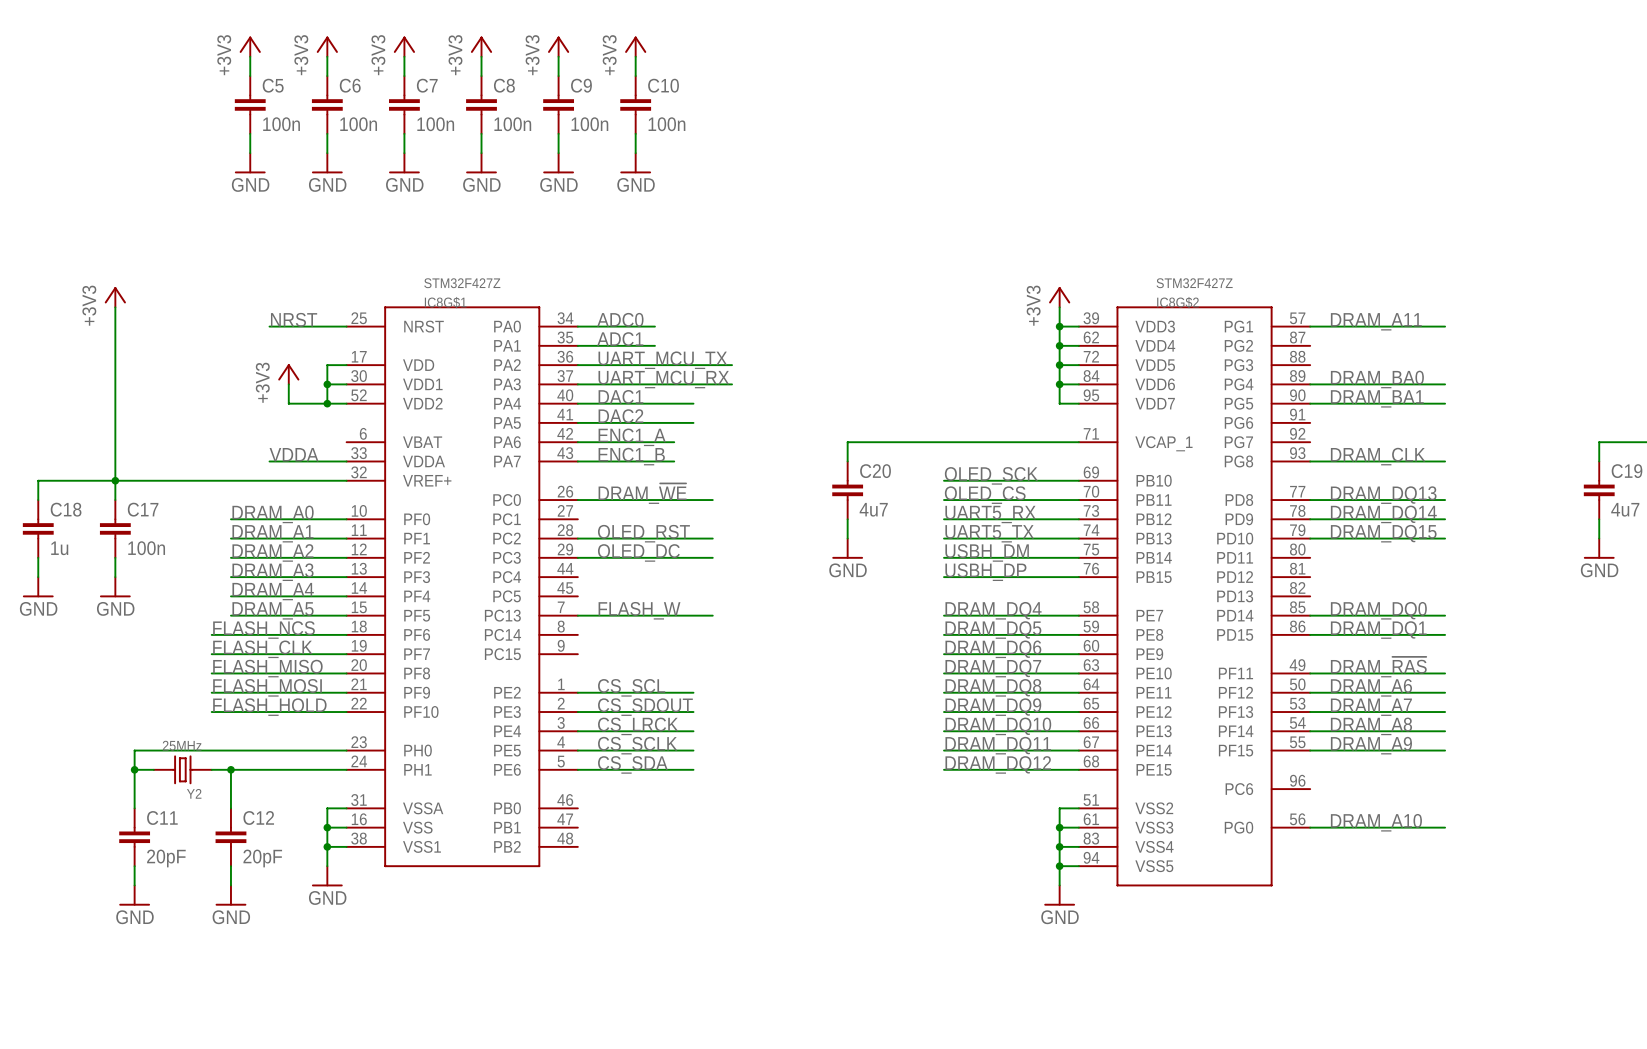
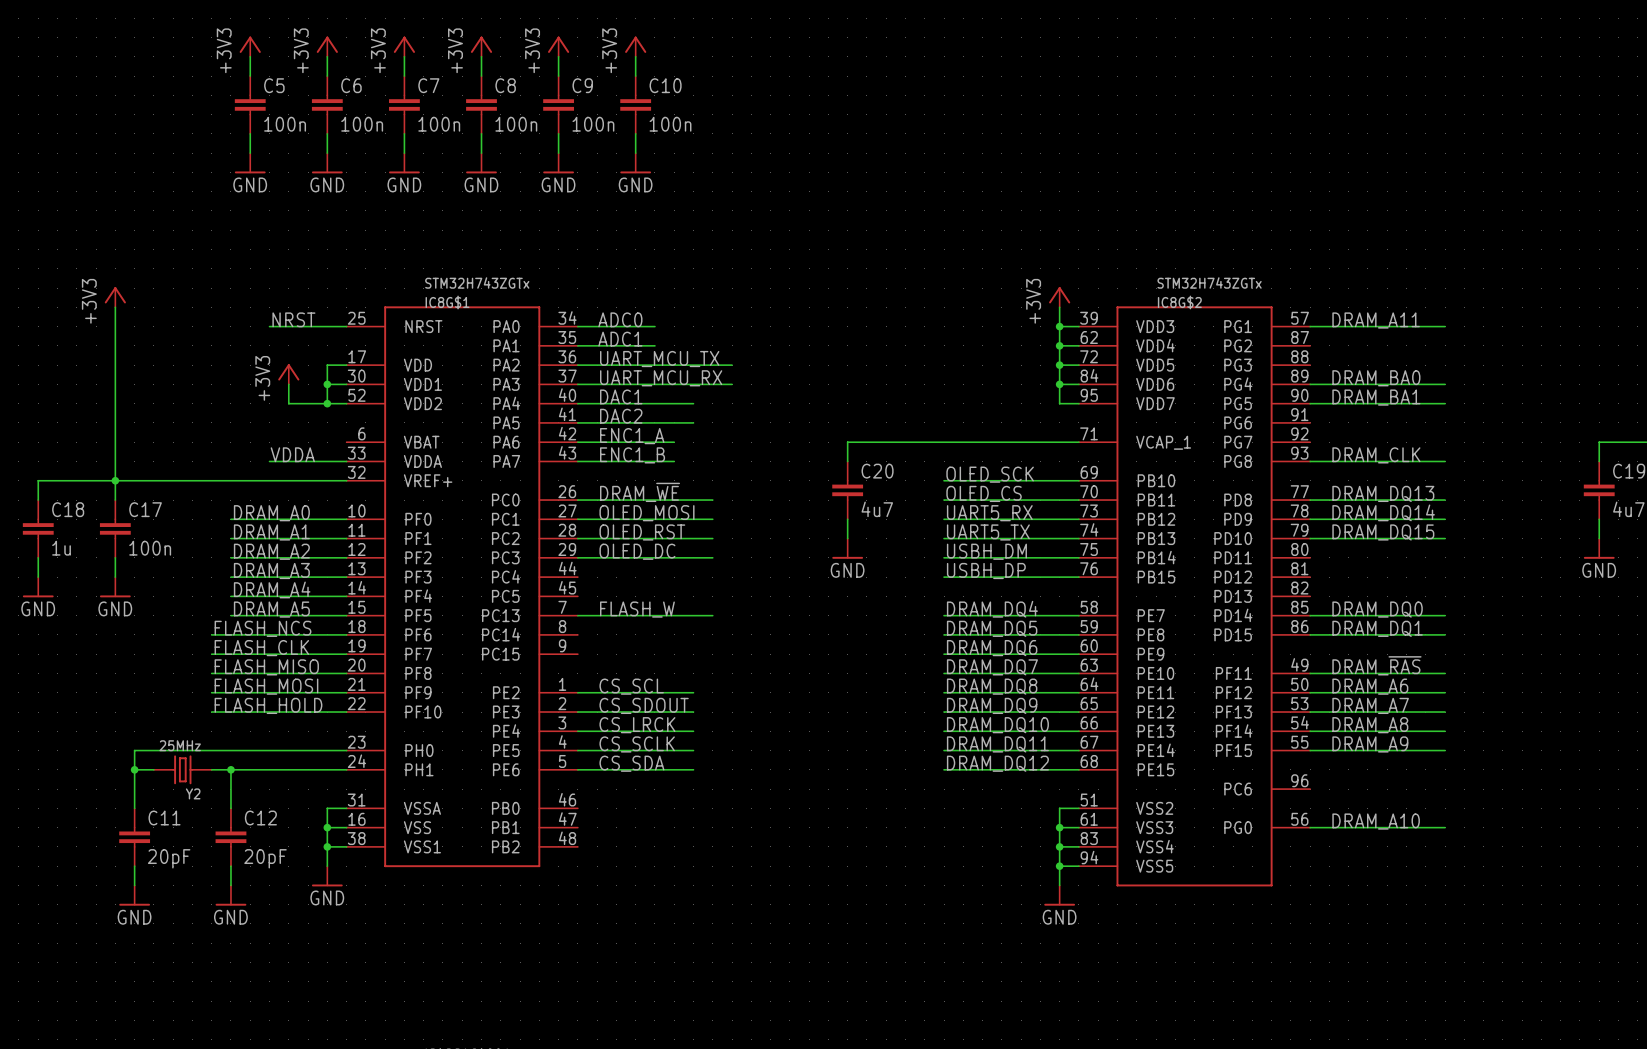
IC8G$1 value: STM32F427Z (462, 283) -> STM32H743ZGTx (477, 282)
IC8G$2 value: STM32F427Z (1194, 283) -> STM32H743ZGTx (1209, 282)
label: none -> OLED_MOSI (646, 513)
wire: none -> (577, 519) (712, 519)

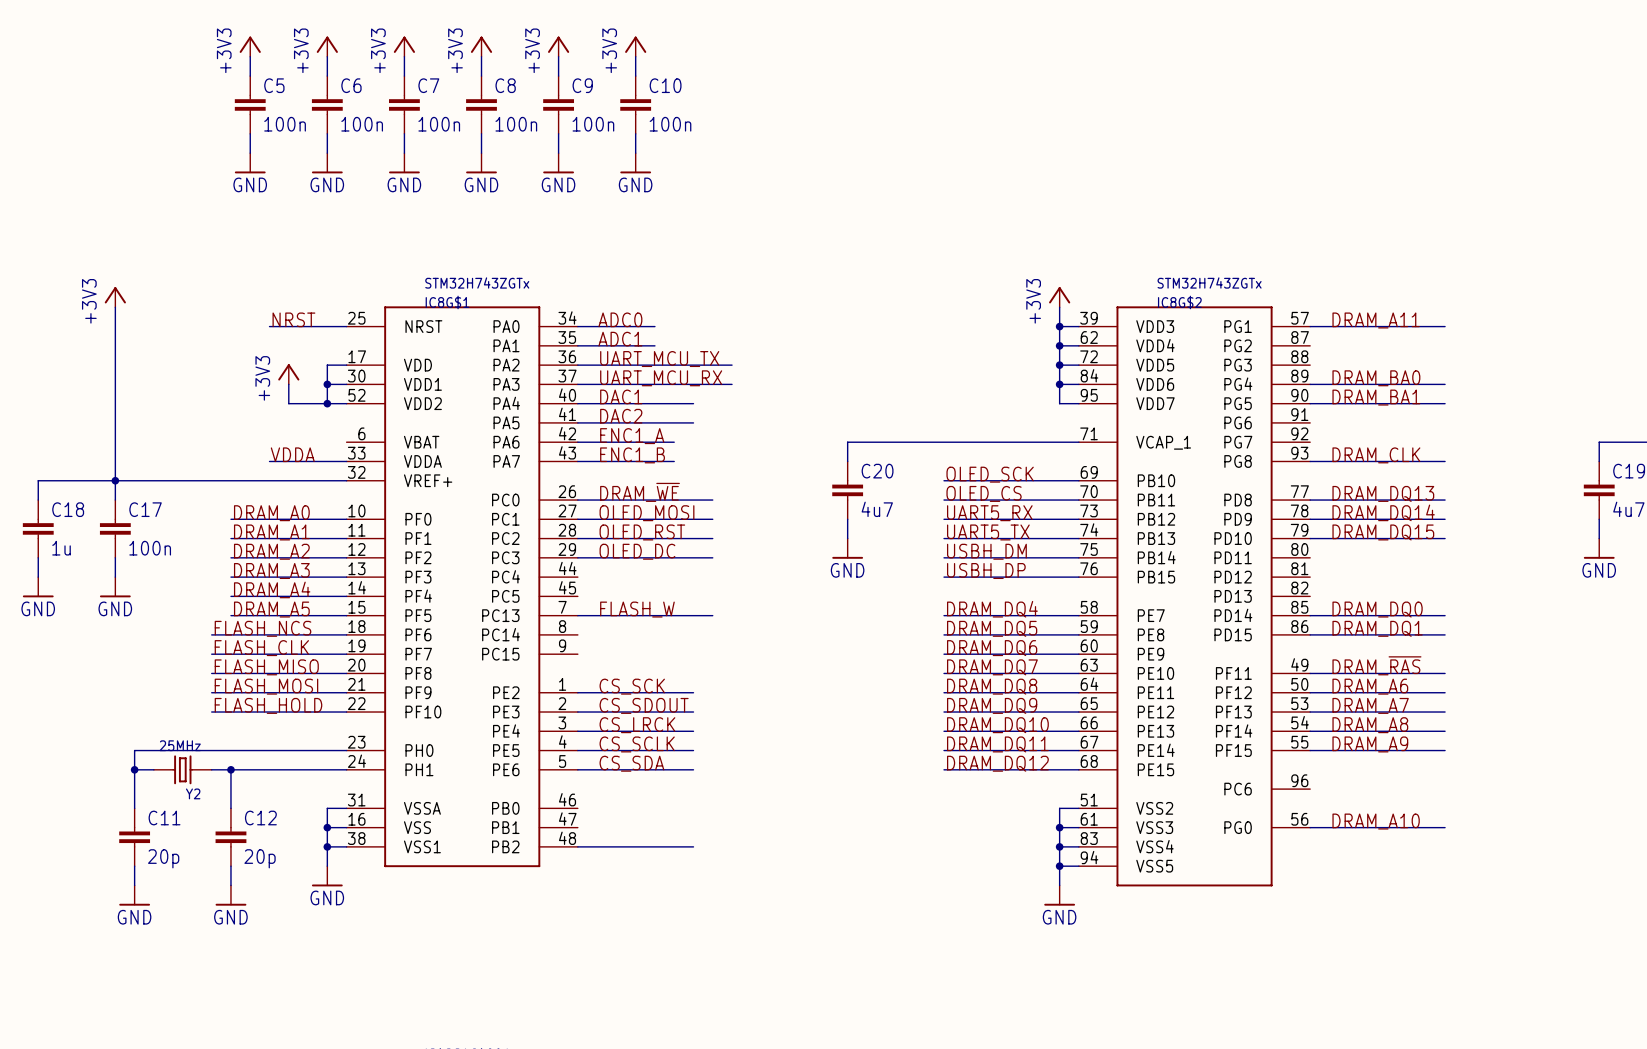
label: CS_SCL (631, 686) -> CS_SCK (632, 686)
wire: none -> (577, 846) (693, 846)
C11 value: 20pF (169, 858) -> 20p (163, 858)
C12 value: 20pF (265, 858) -> 20p (260, 858)

